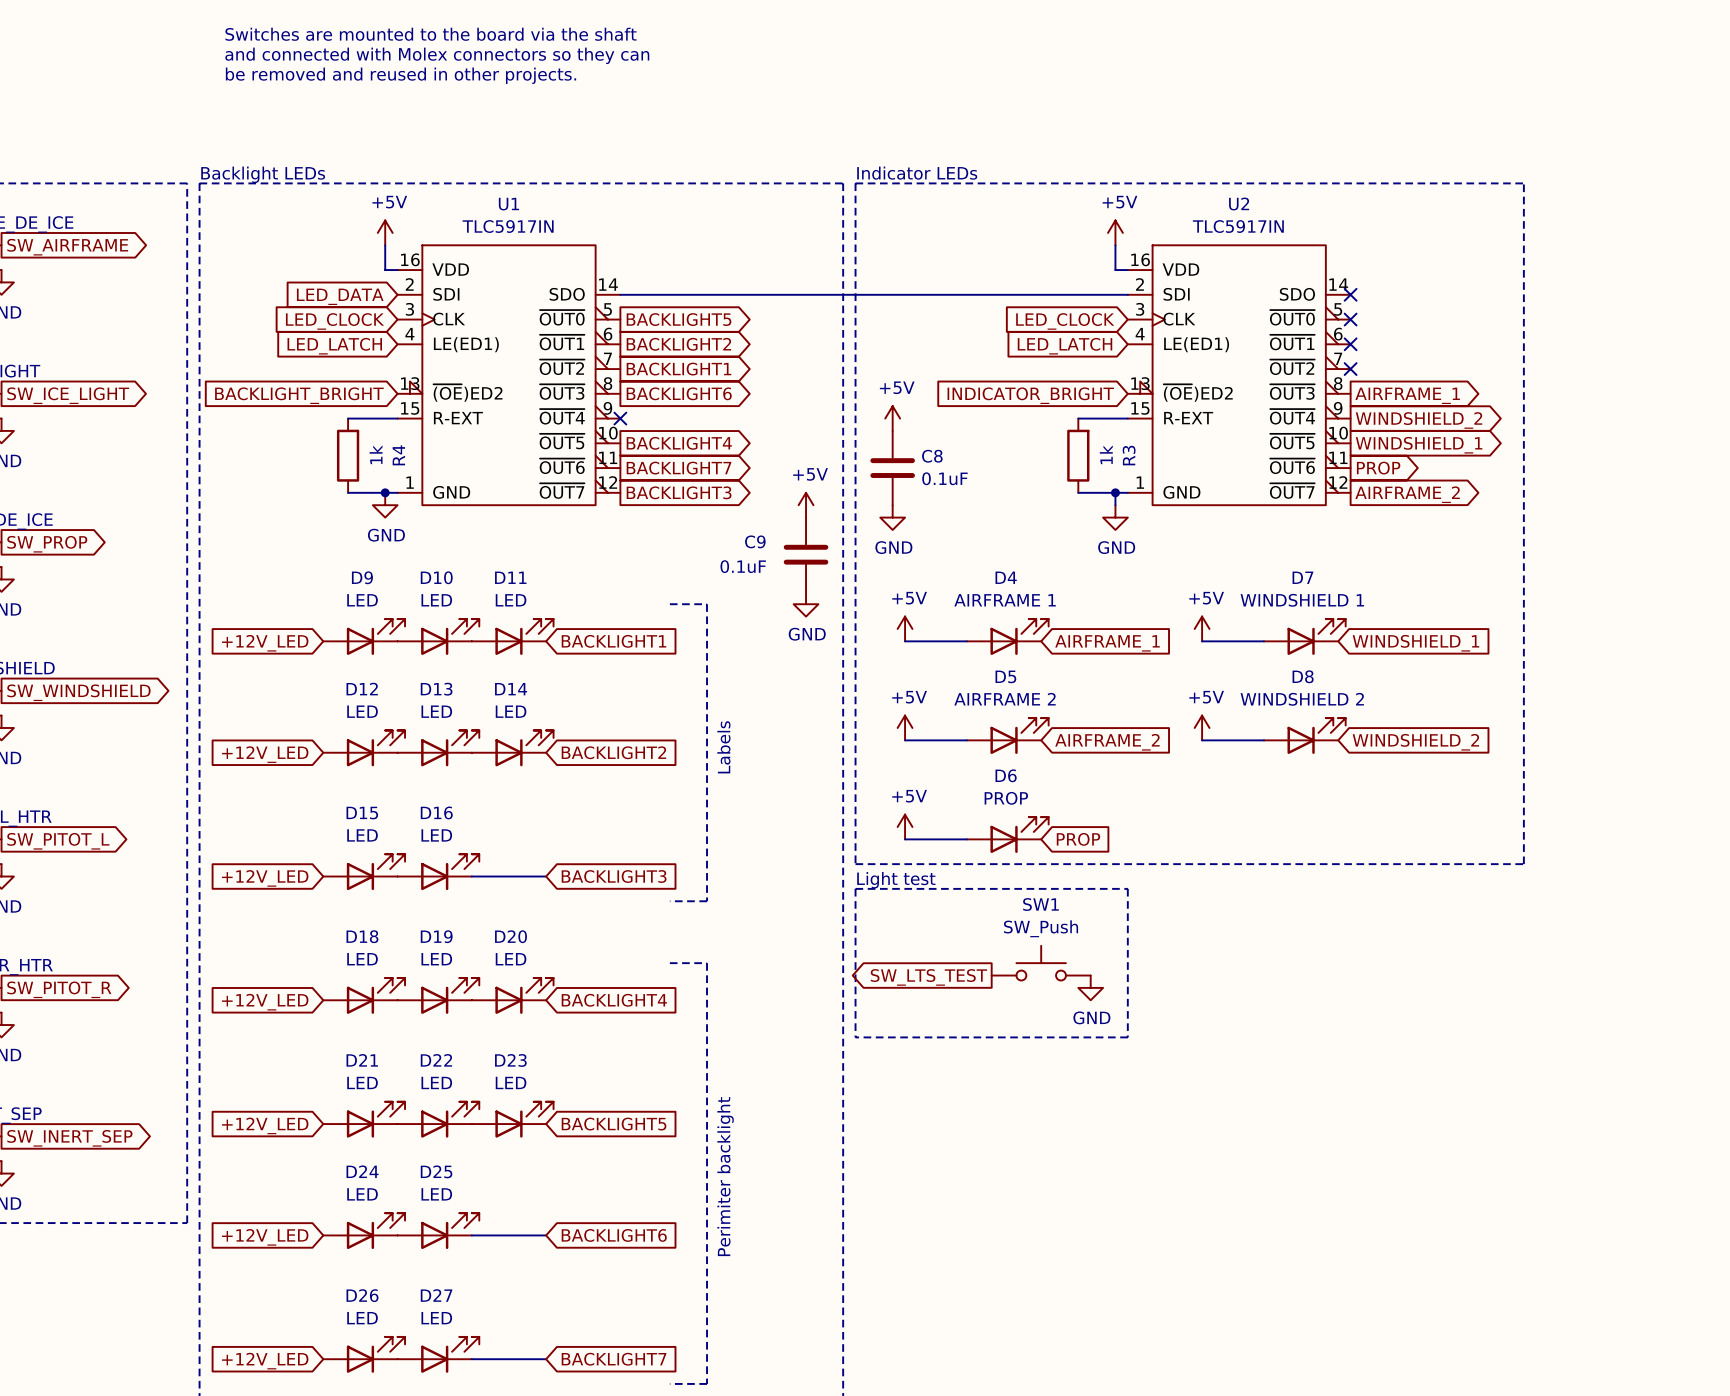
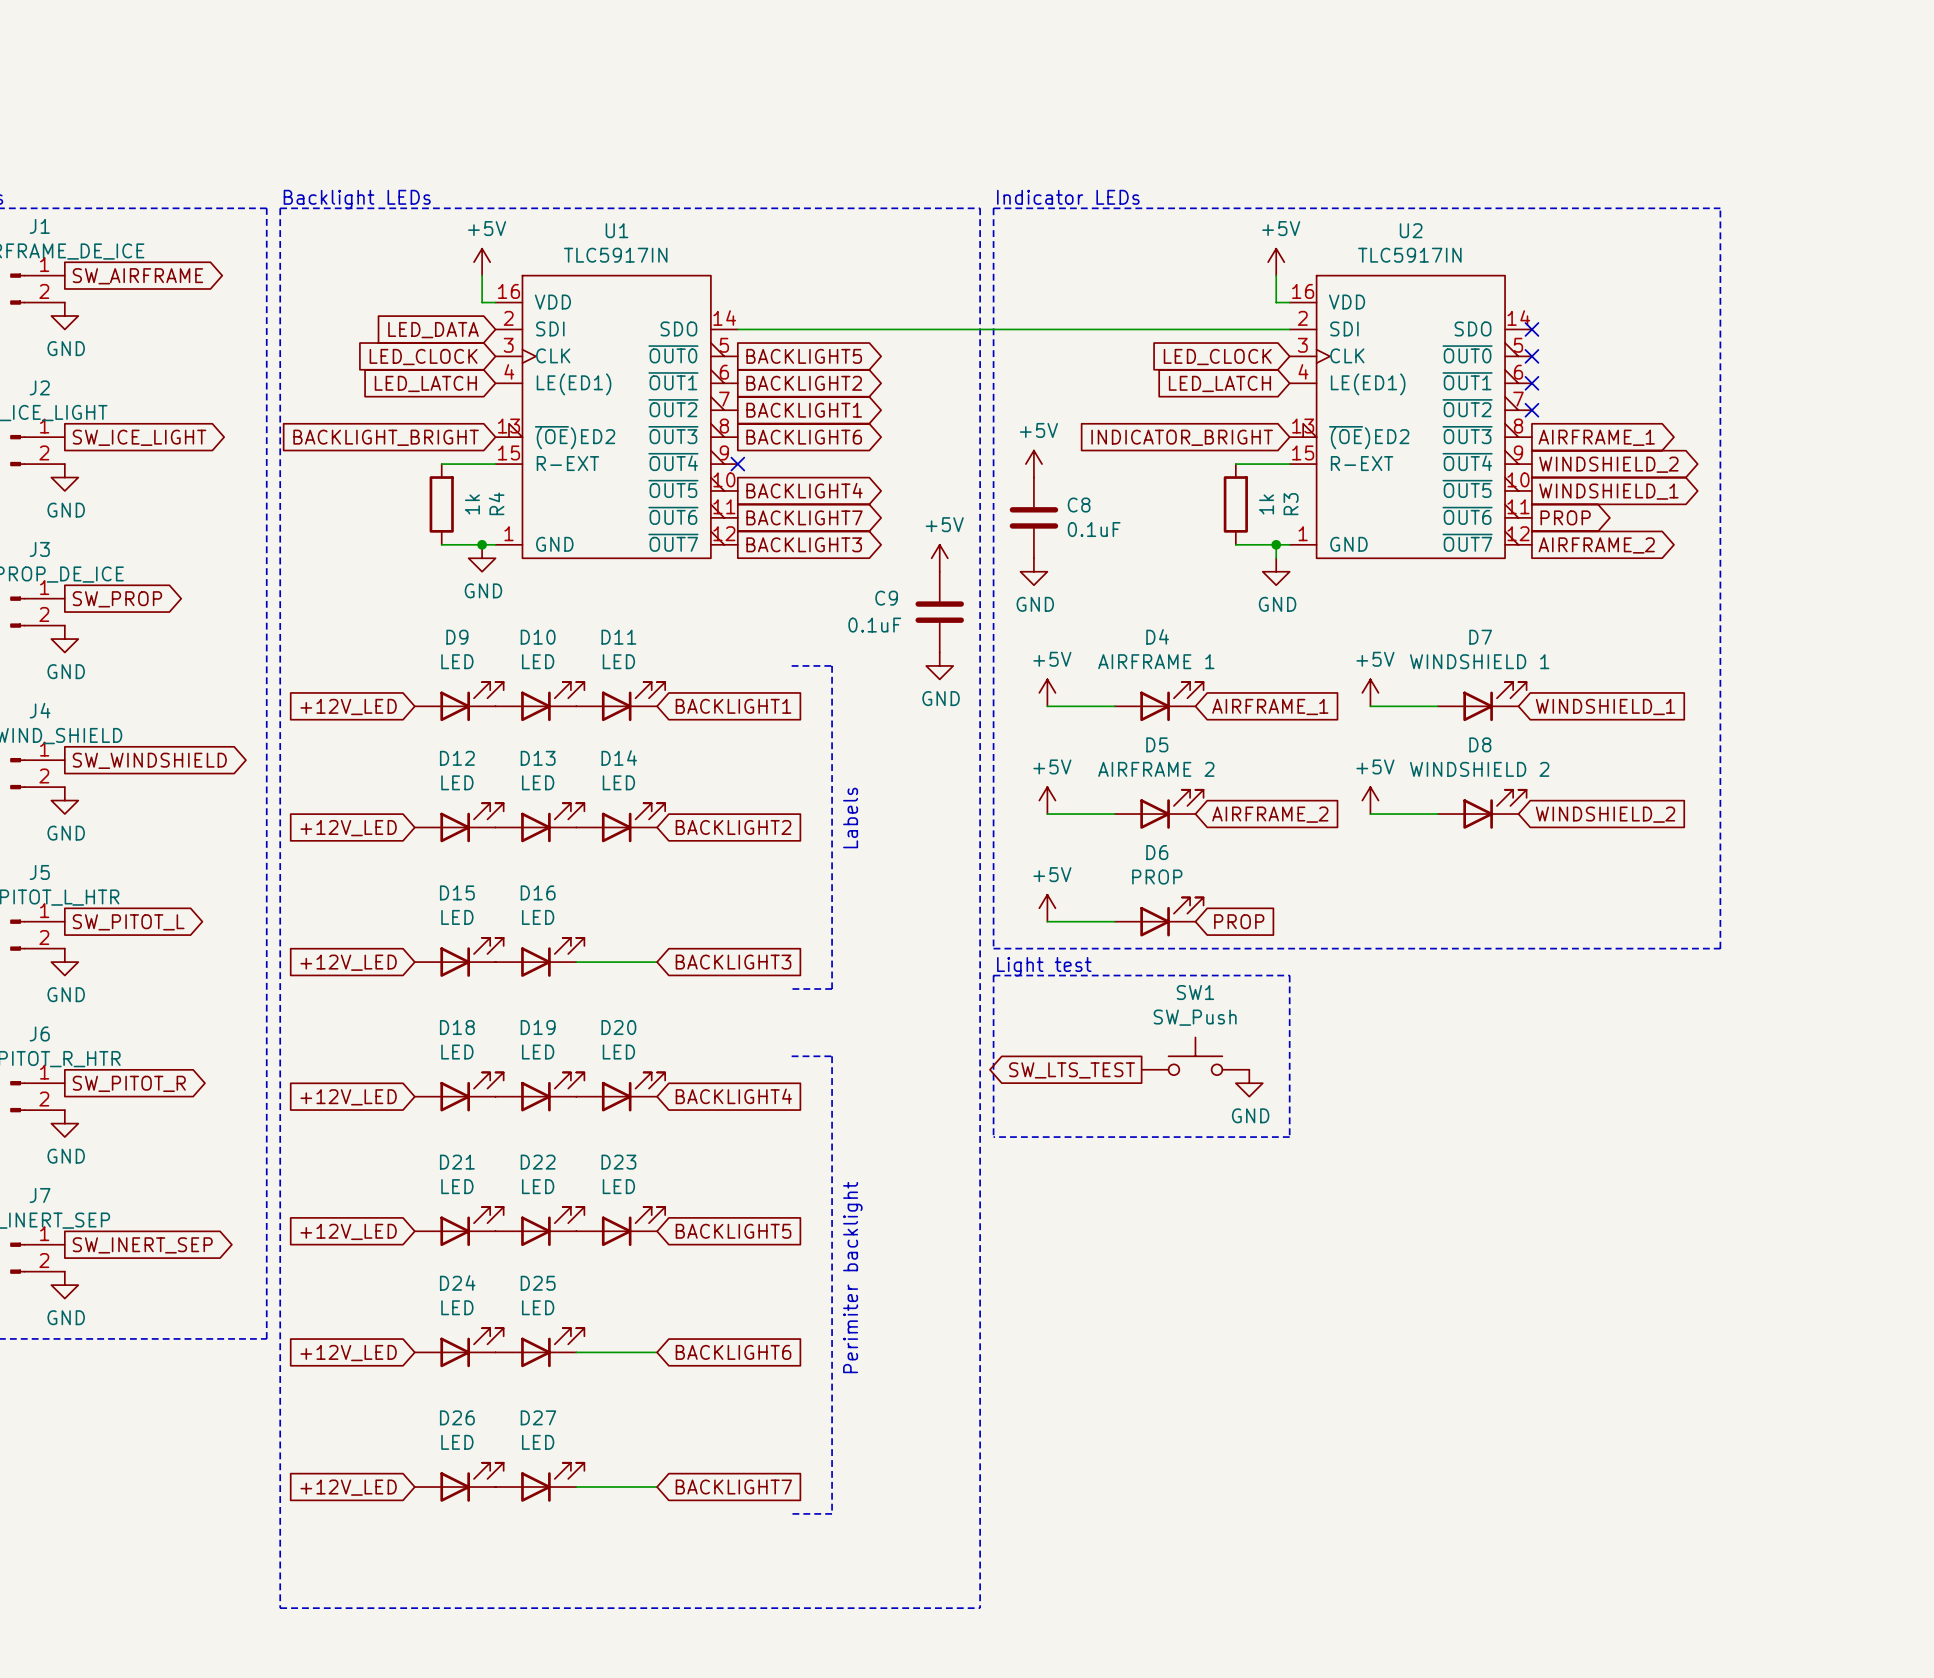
text: Switches are mounted to the board via the shaft (430, 34) -> none
text: and connected with Molex connectors so they can (437, 55) -> none
text: be removed and reused in other projects. (400, 75) -> none

